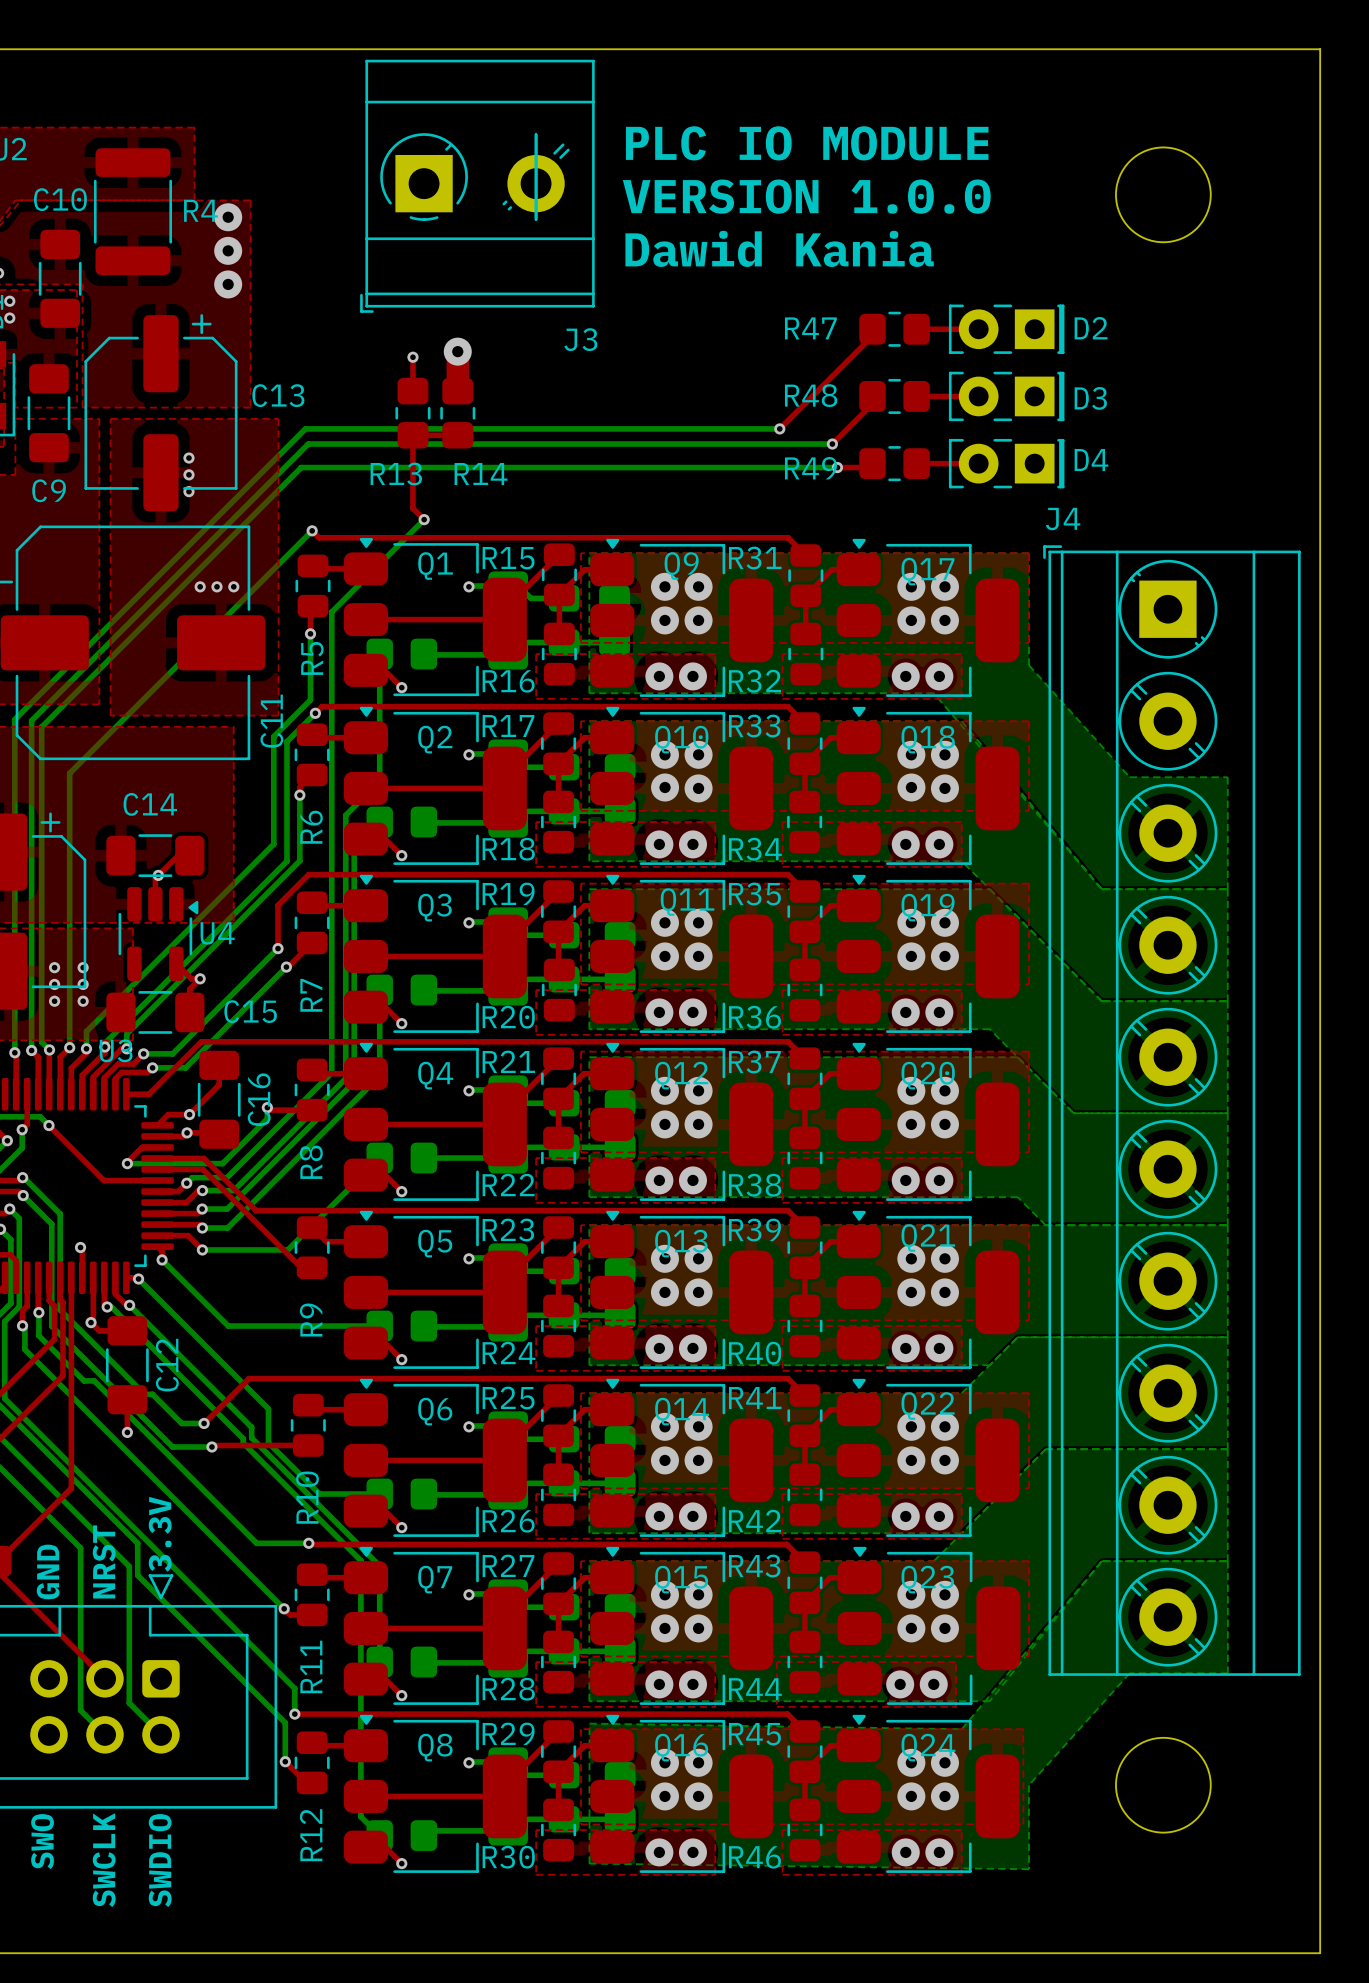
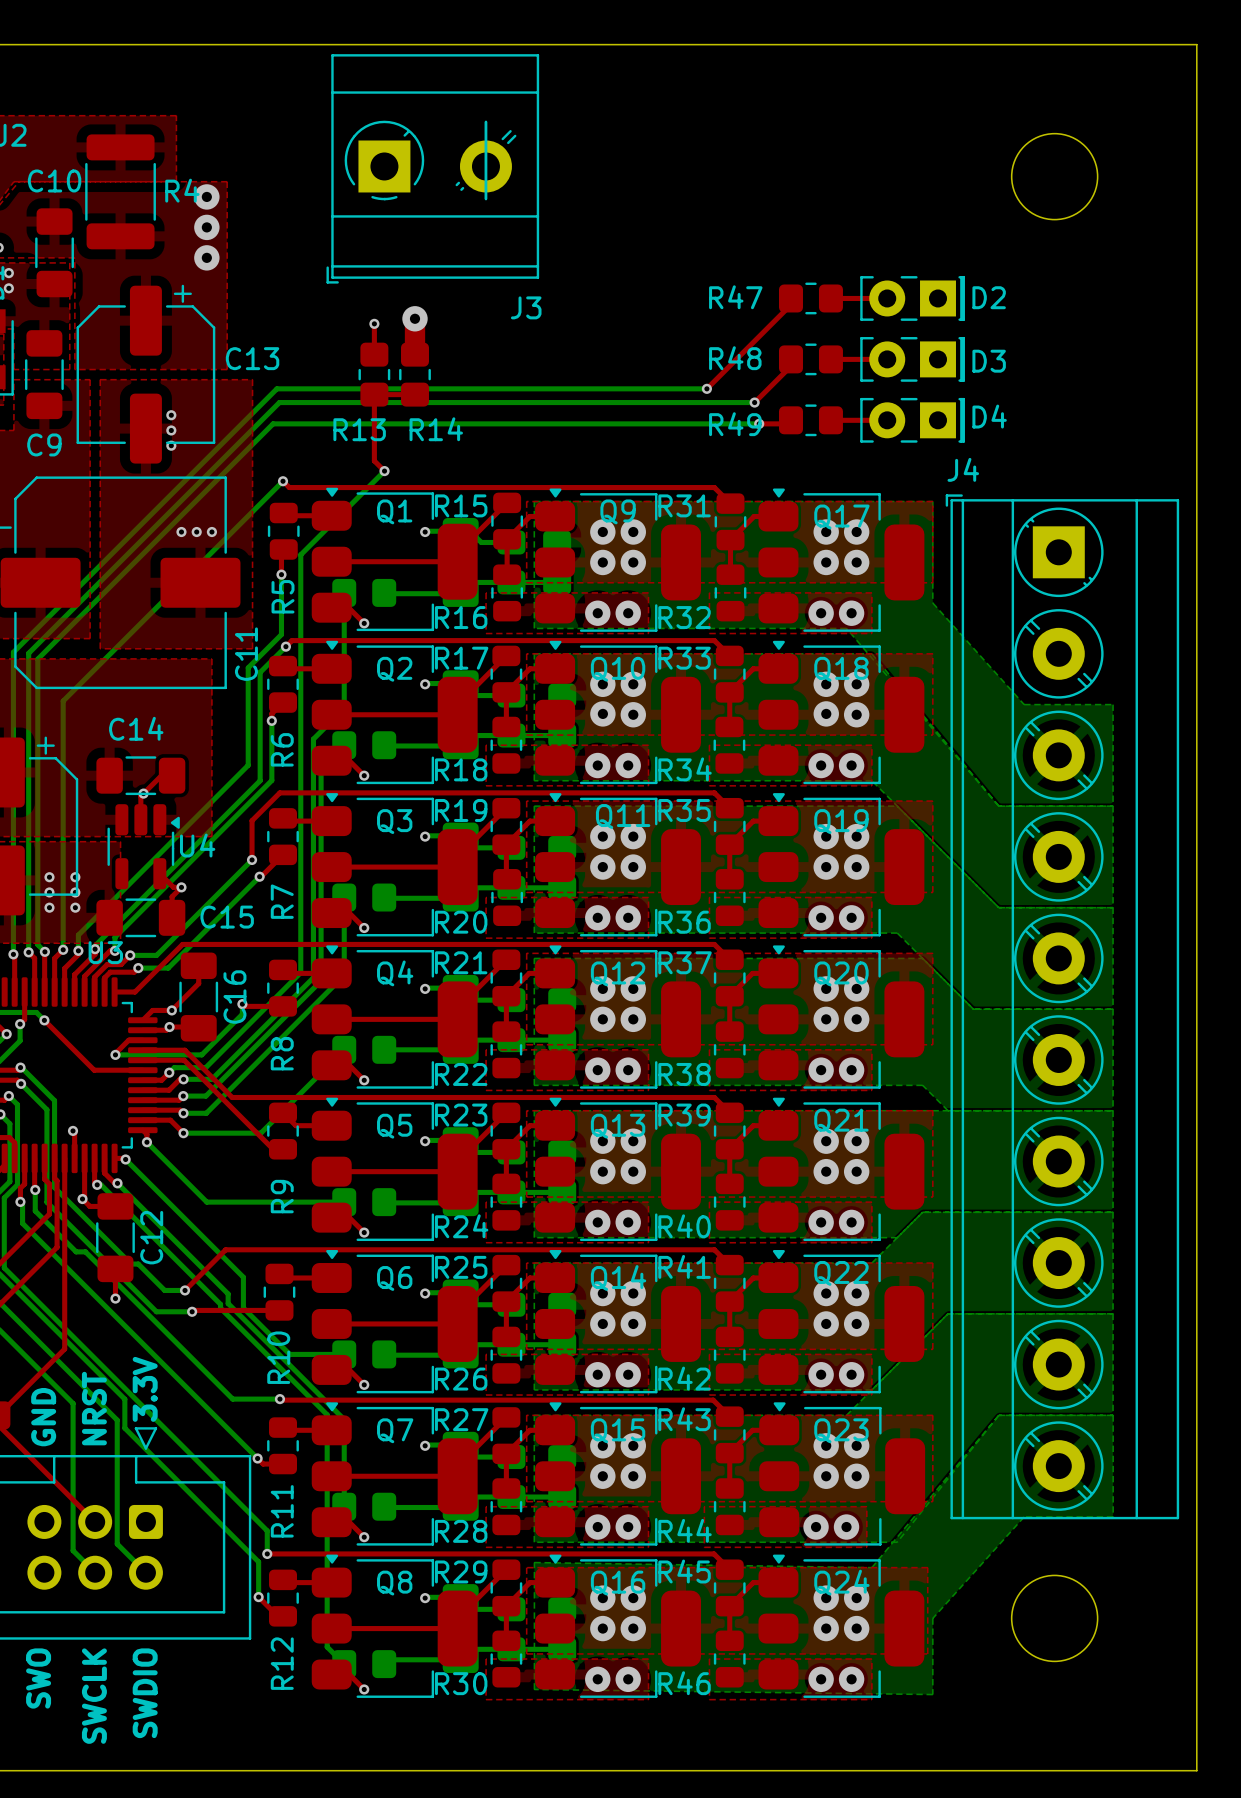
text: PLC IO MODULE (807, 143) -> none
text: VERSION 1.0.0 (806, 196) -> none
text: Dawid Kania (779, 248) -> none

